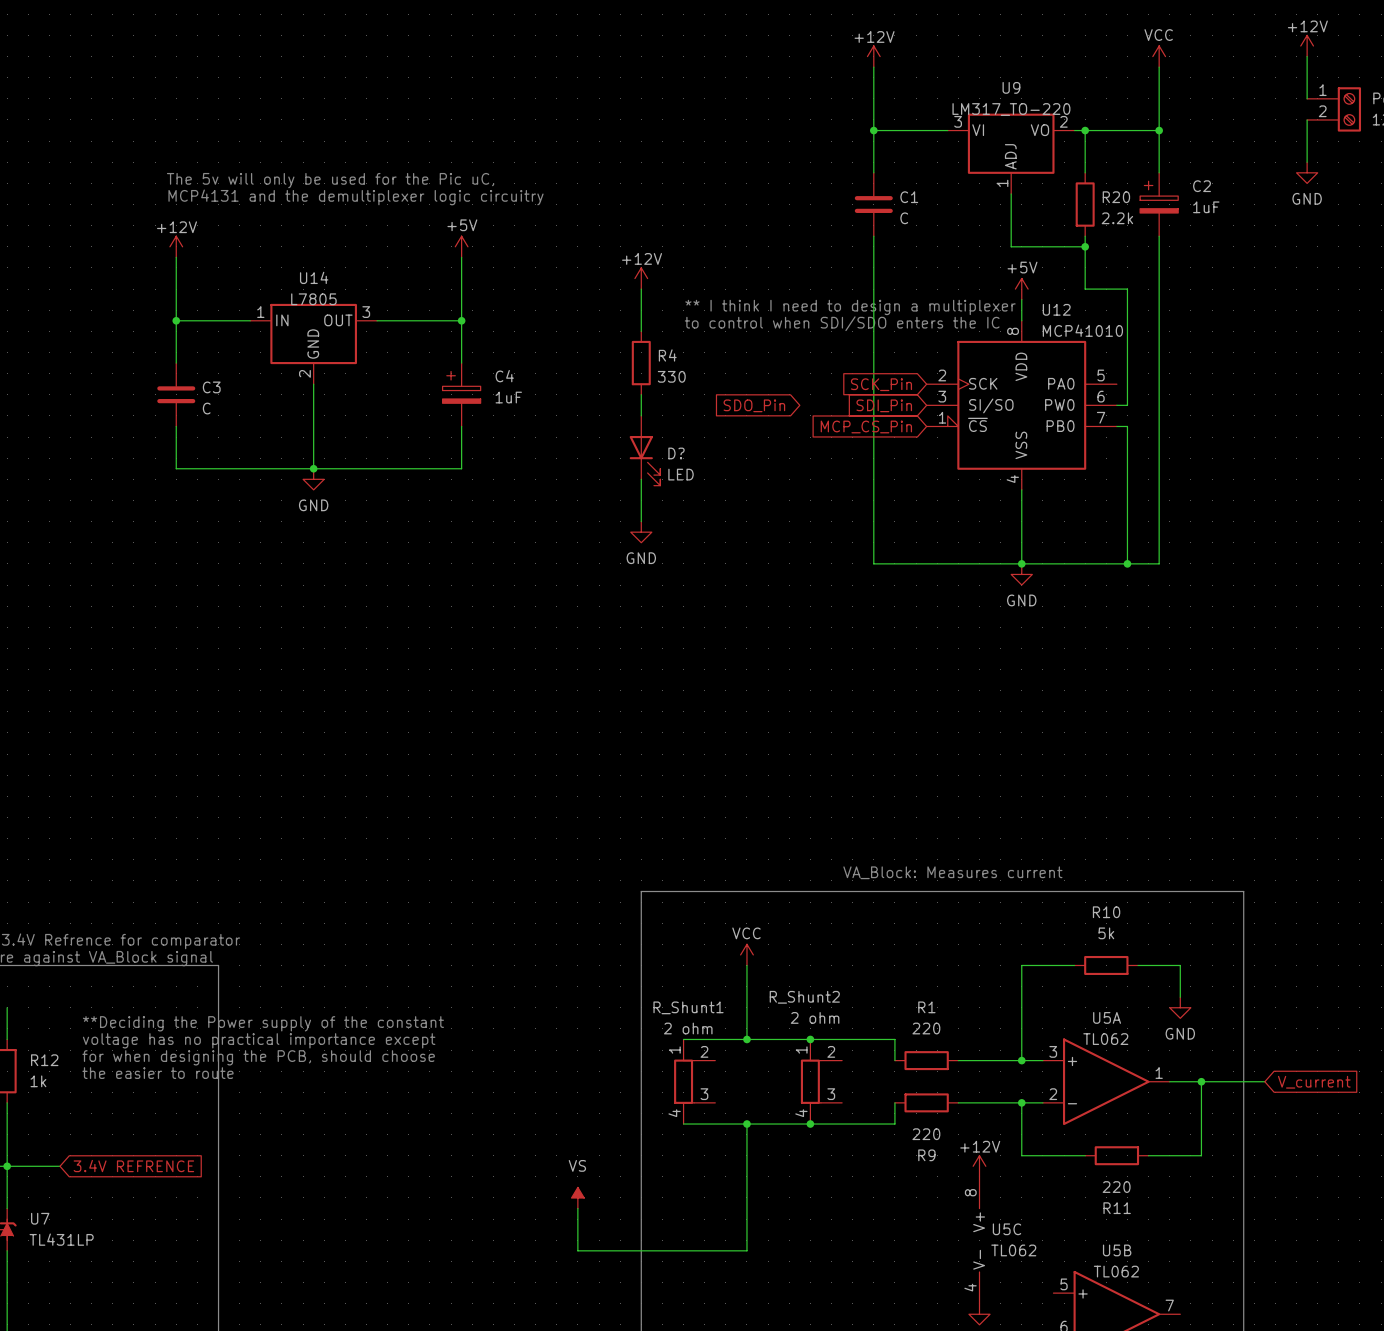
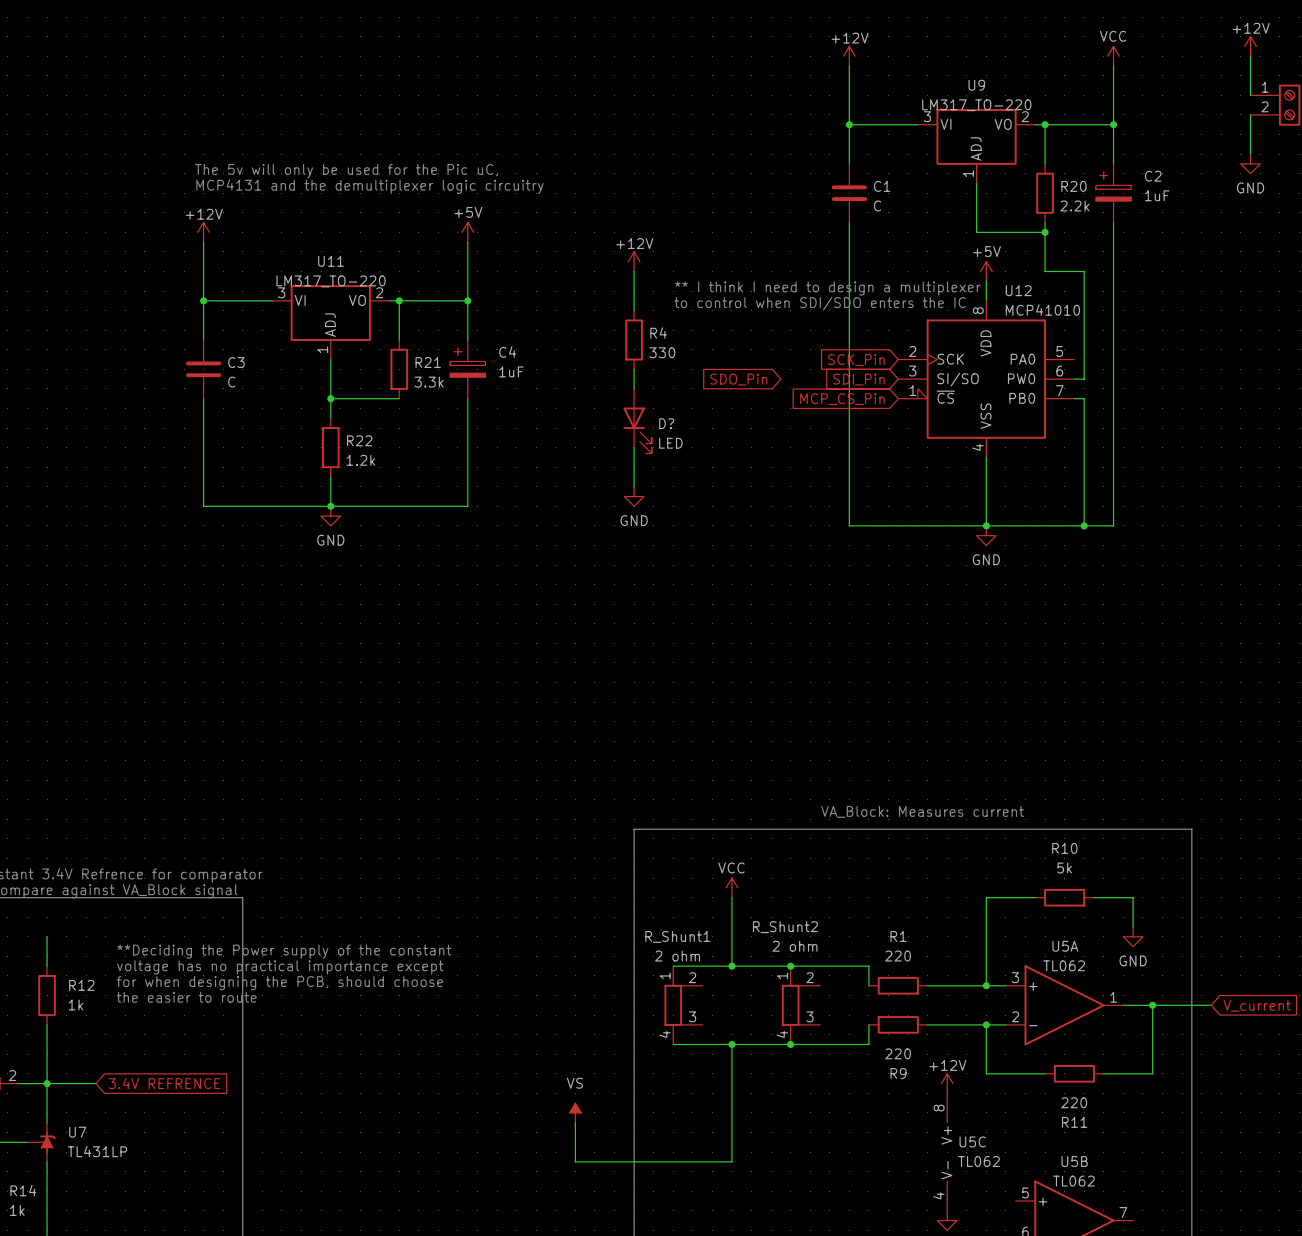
U14 name: U14 (314, 277) -> U11 (331, 261)
U14 value: L7805 (313, 299) -> LM317_TO-220 (331, 281)
U14 pin number: 1 (260, 312) -> 3 (281, 292)
U14 pin number: 3 (366, 312) -> 2 (379, 292)
U14 pin name: IN (282, 320) -> VI (300, 300)
U14 pin name: OUT (338, 320) -> VO (357, 300)
wire: none -> (399, 300) (399, 339)
junction: none -> (399, 300)
U14 pin name: GND (313, 344) -> ADJ (330, 325)
U14 pin number: 2 (304, 373) -> 1 (322, 349)
R21: none -> 3.3k (399, 369)
wire: none -> (330, 398) (399, 398)
junction: none -> (330, 398)
wire: (176, 468) (461, 468) -> (203, 437) (203, 506) (467, 506) (467, 437)
junction: (313, 468) -> none
power symbol position: GND (313, 479) -> GND (330, 516)
R22: none -> 1.2k (330, 447)
wire: none -> (330, 476) (330, 506)
junction: none -> (330, 506)

